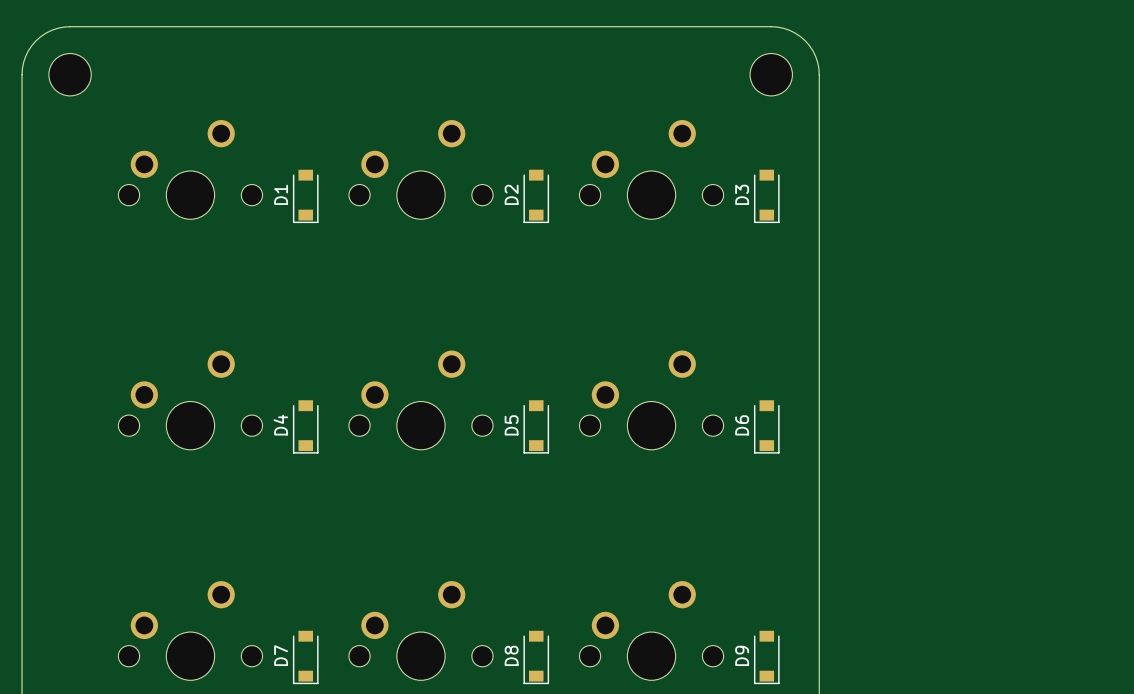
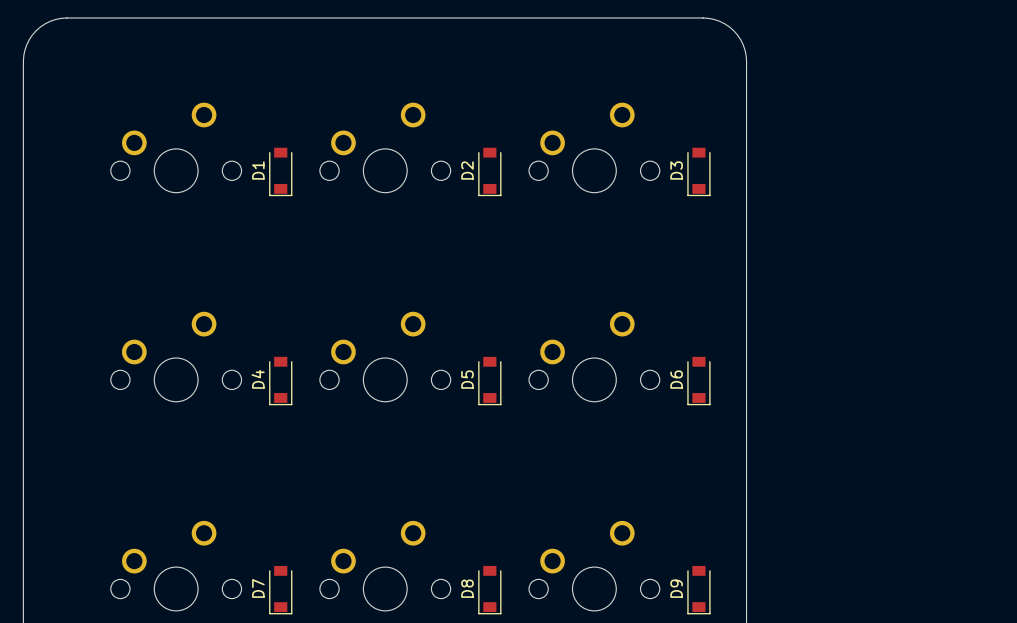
part: (70, 74) -> none
part: (771, 74) -> none

